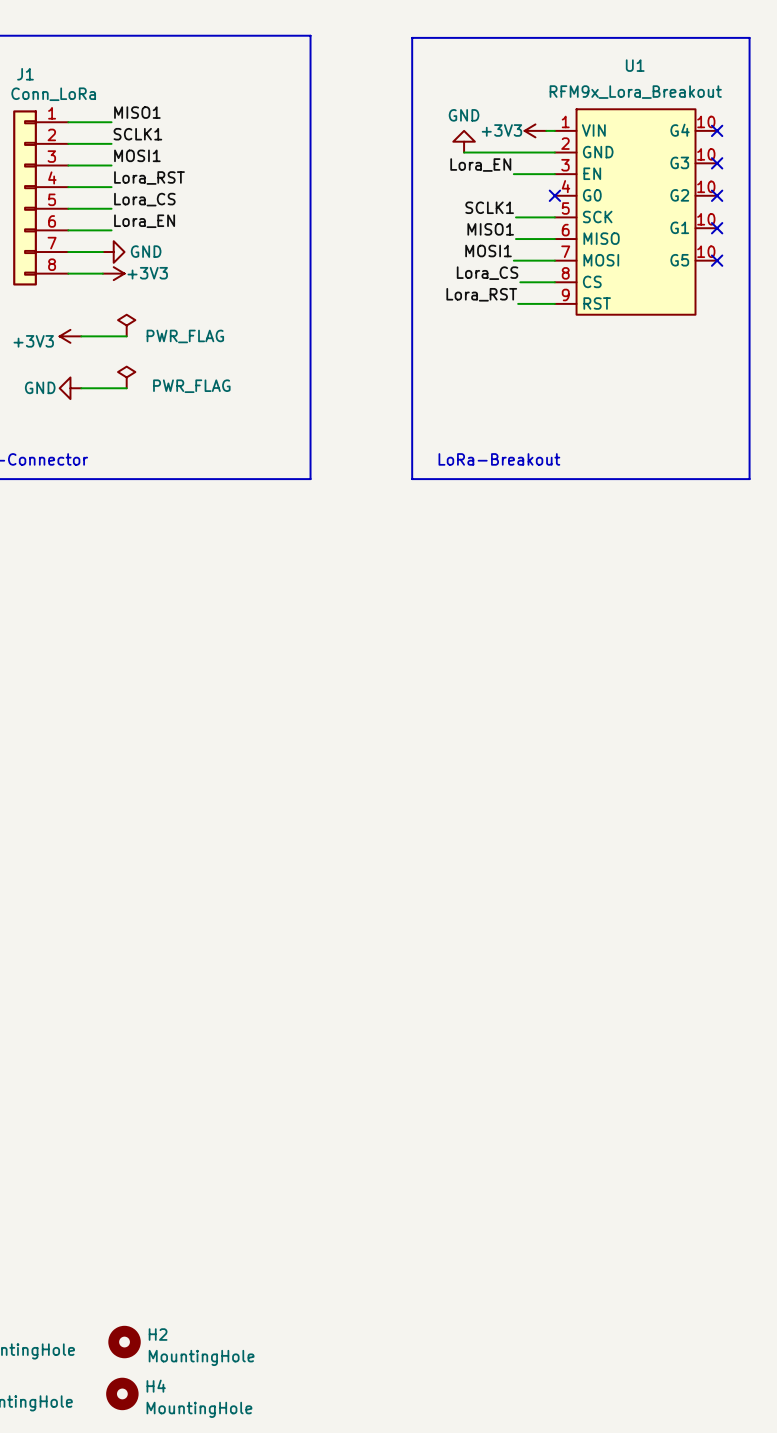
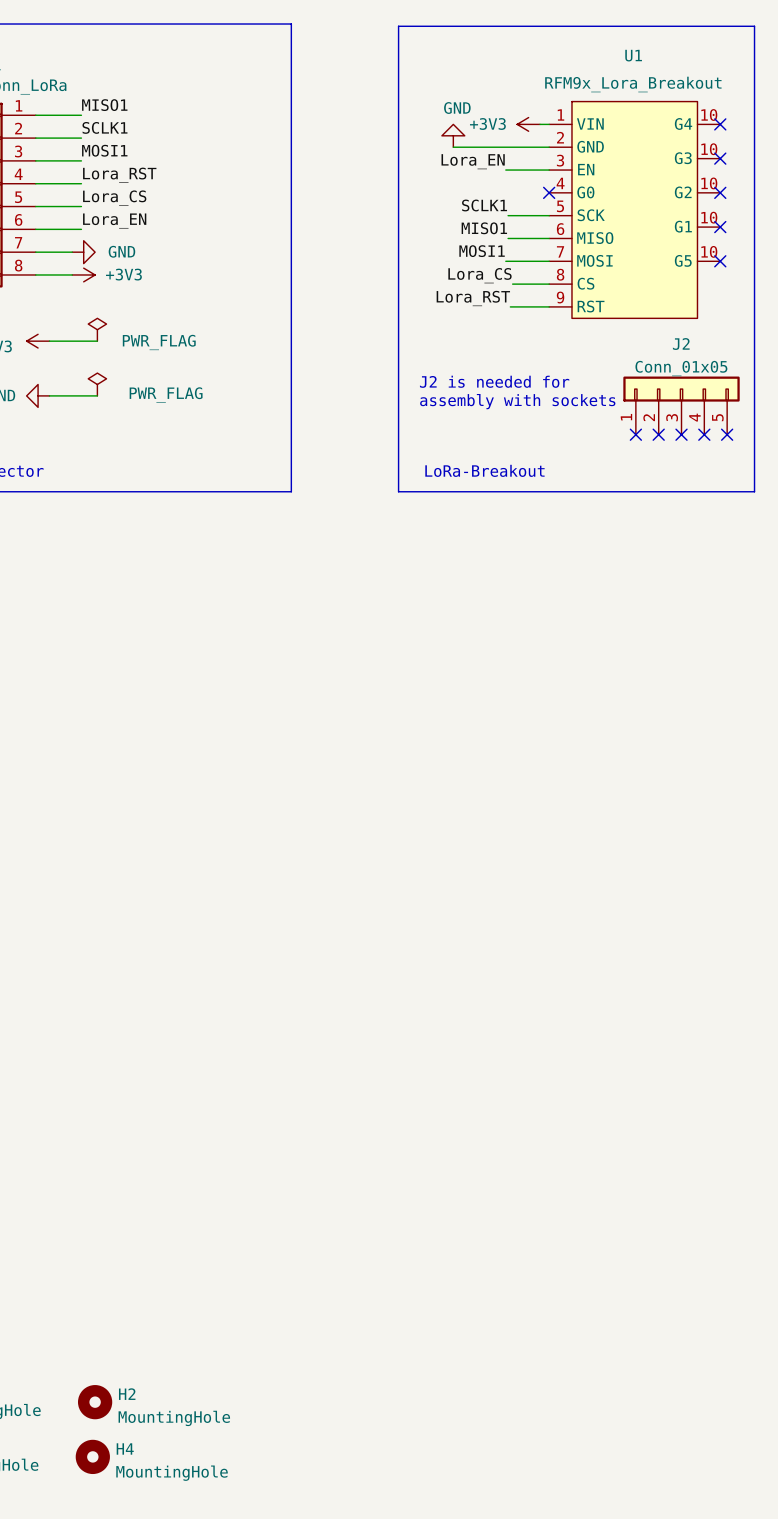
text: none -> J2 is needed for (494, 381)
text: none -> assembly with sockets (517, 401)
J2: none -> Conn_01x05 (681, 405)
no-connect mark: none -> (635, 434)
no-connect mark: none -> (658, 434)
no-connect mark: none -> (681, 434)
no-connect mark: none -> (704, 434)
no-connect mark: none -> (727, 434)

